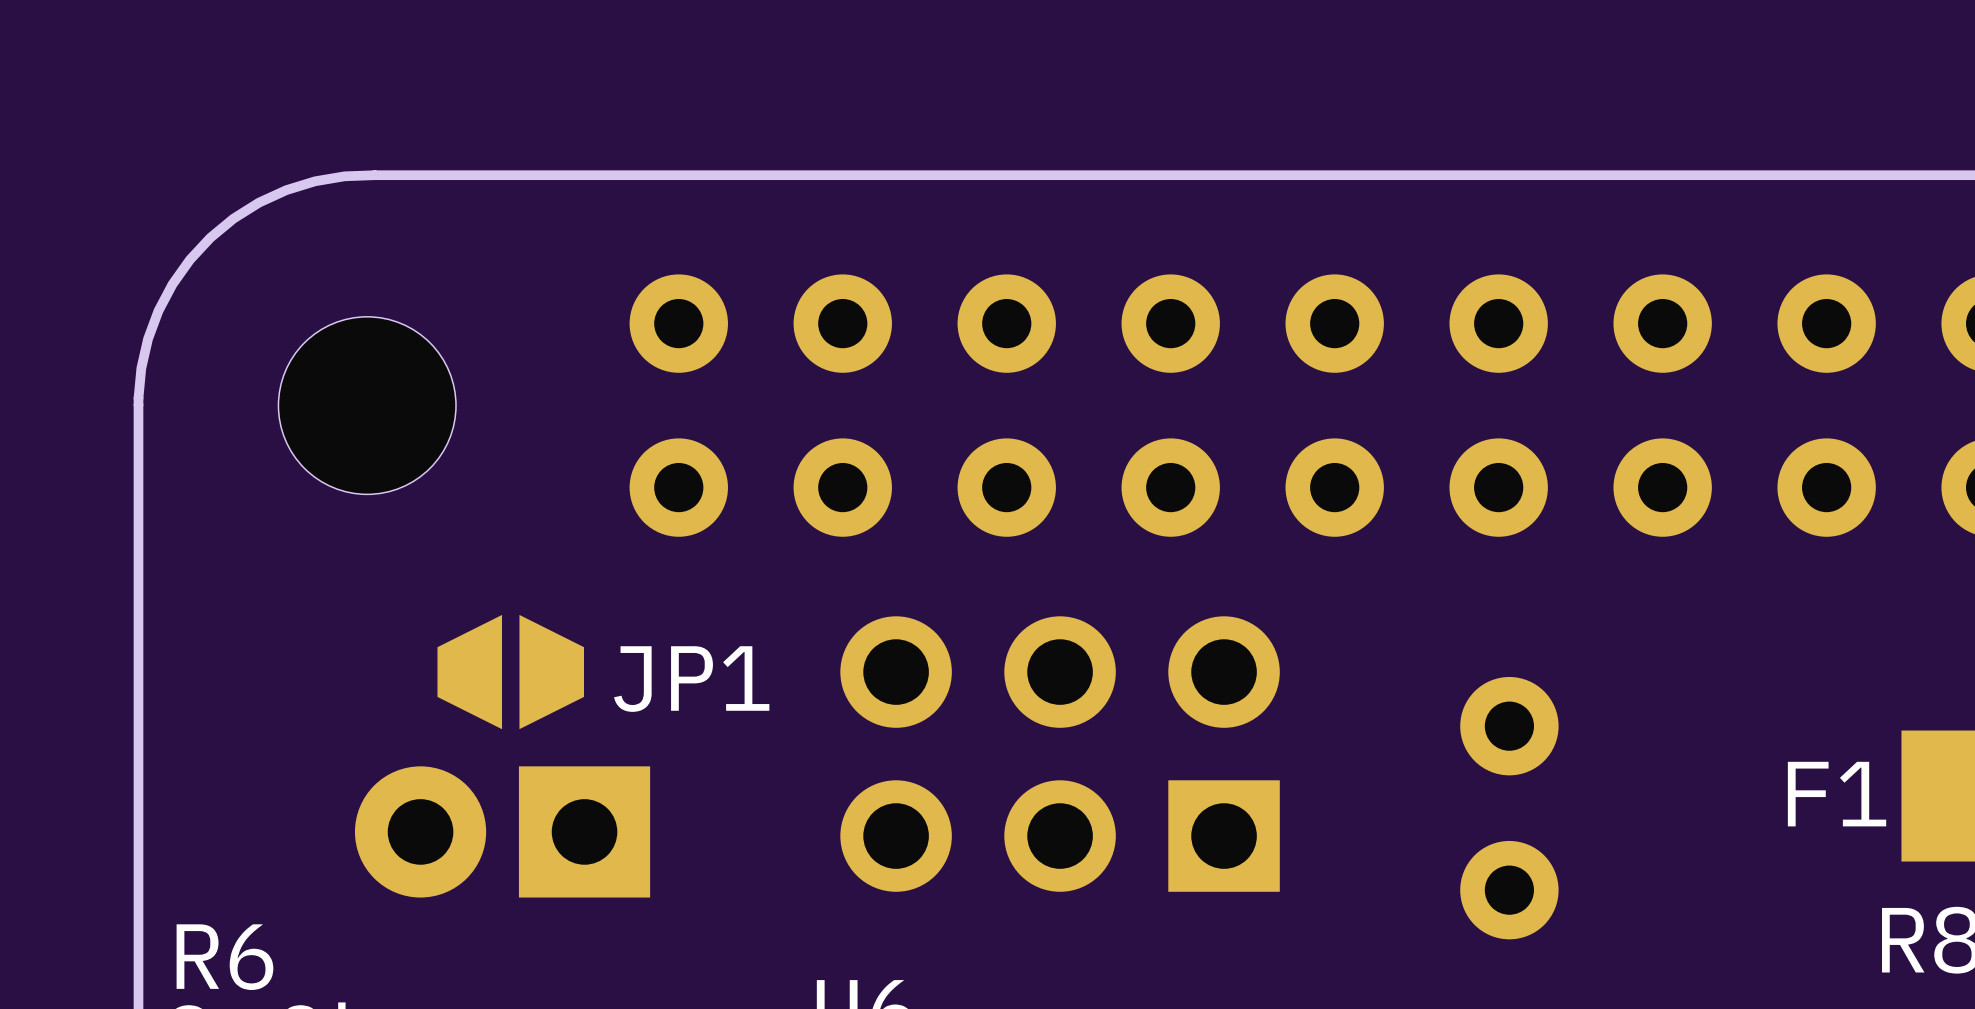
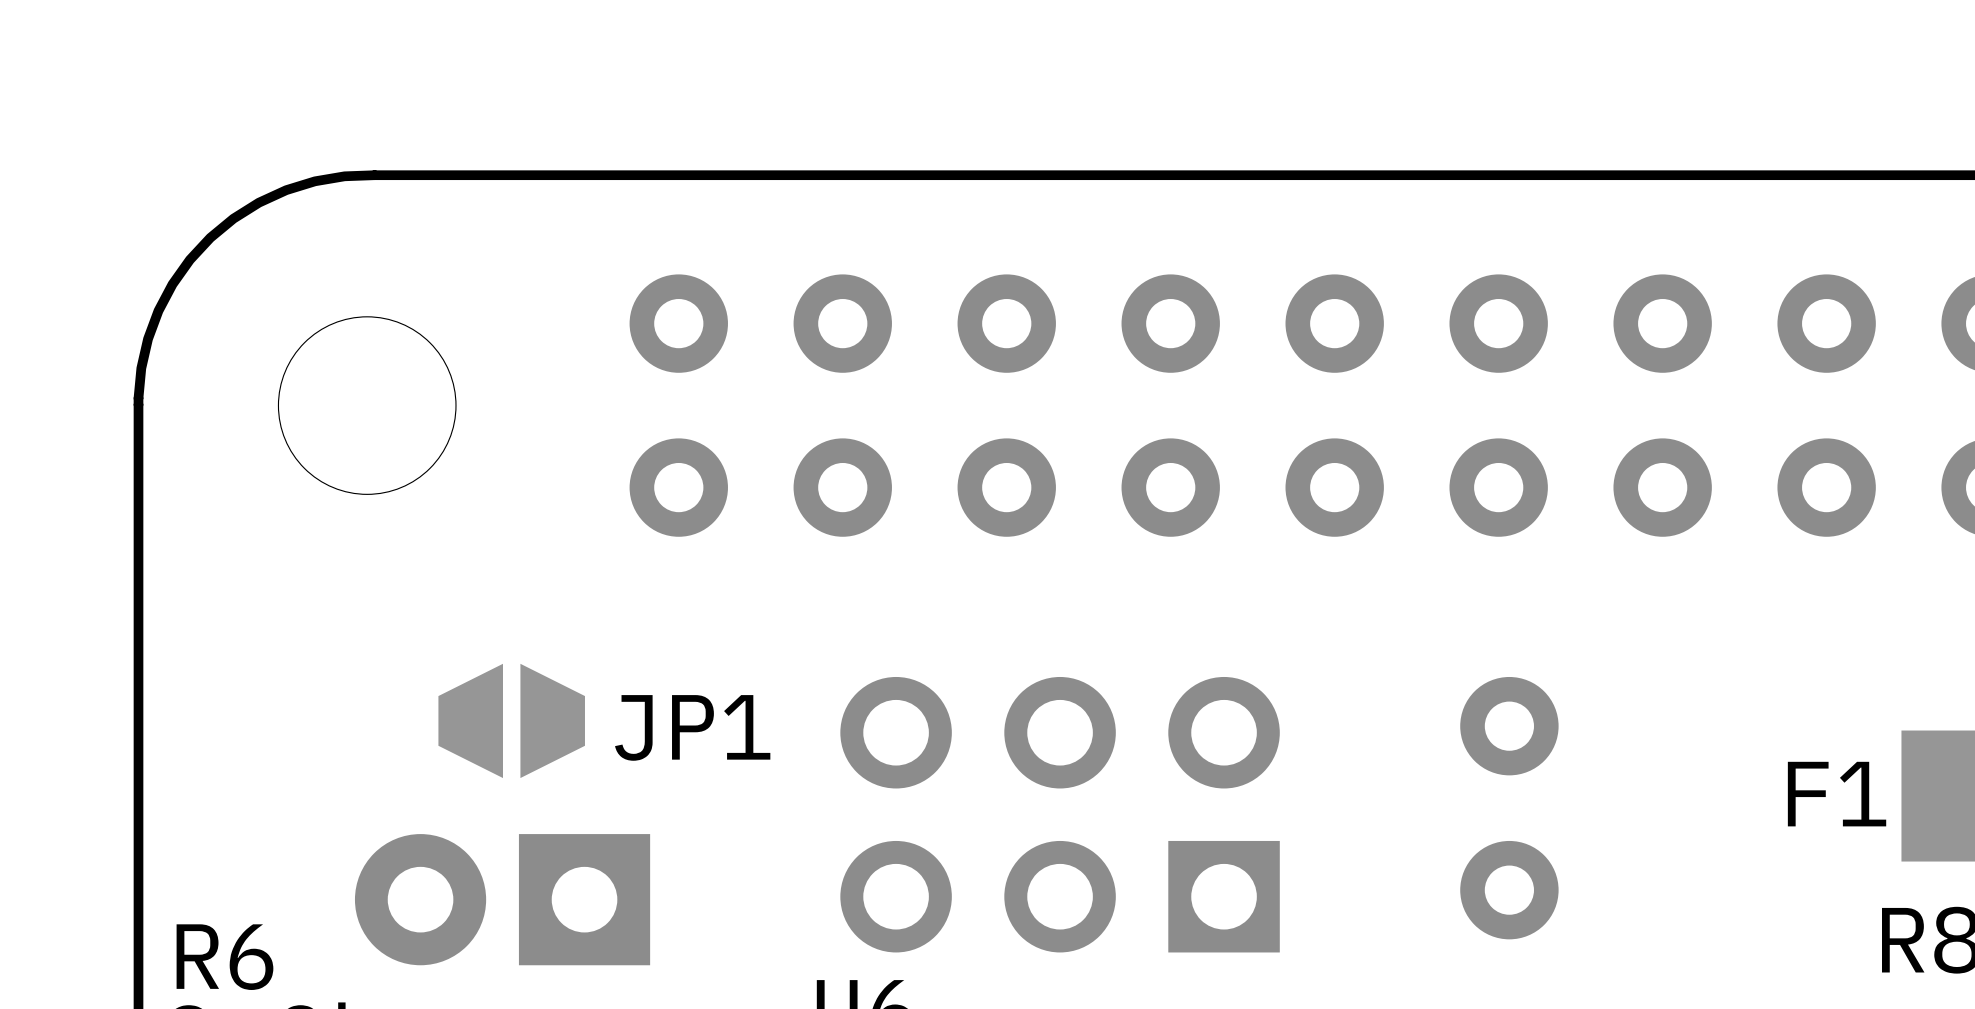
JP1 position: (510, 672) -> (511, 720)
part position: (1060, 754) -> (1060, 814)
part position: (502, 831) -> (502, 899)

